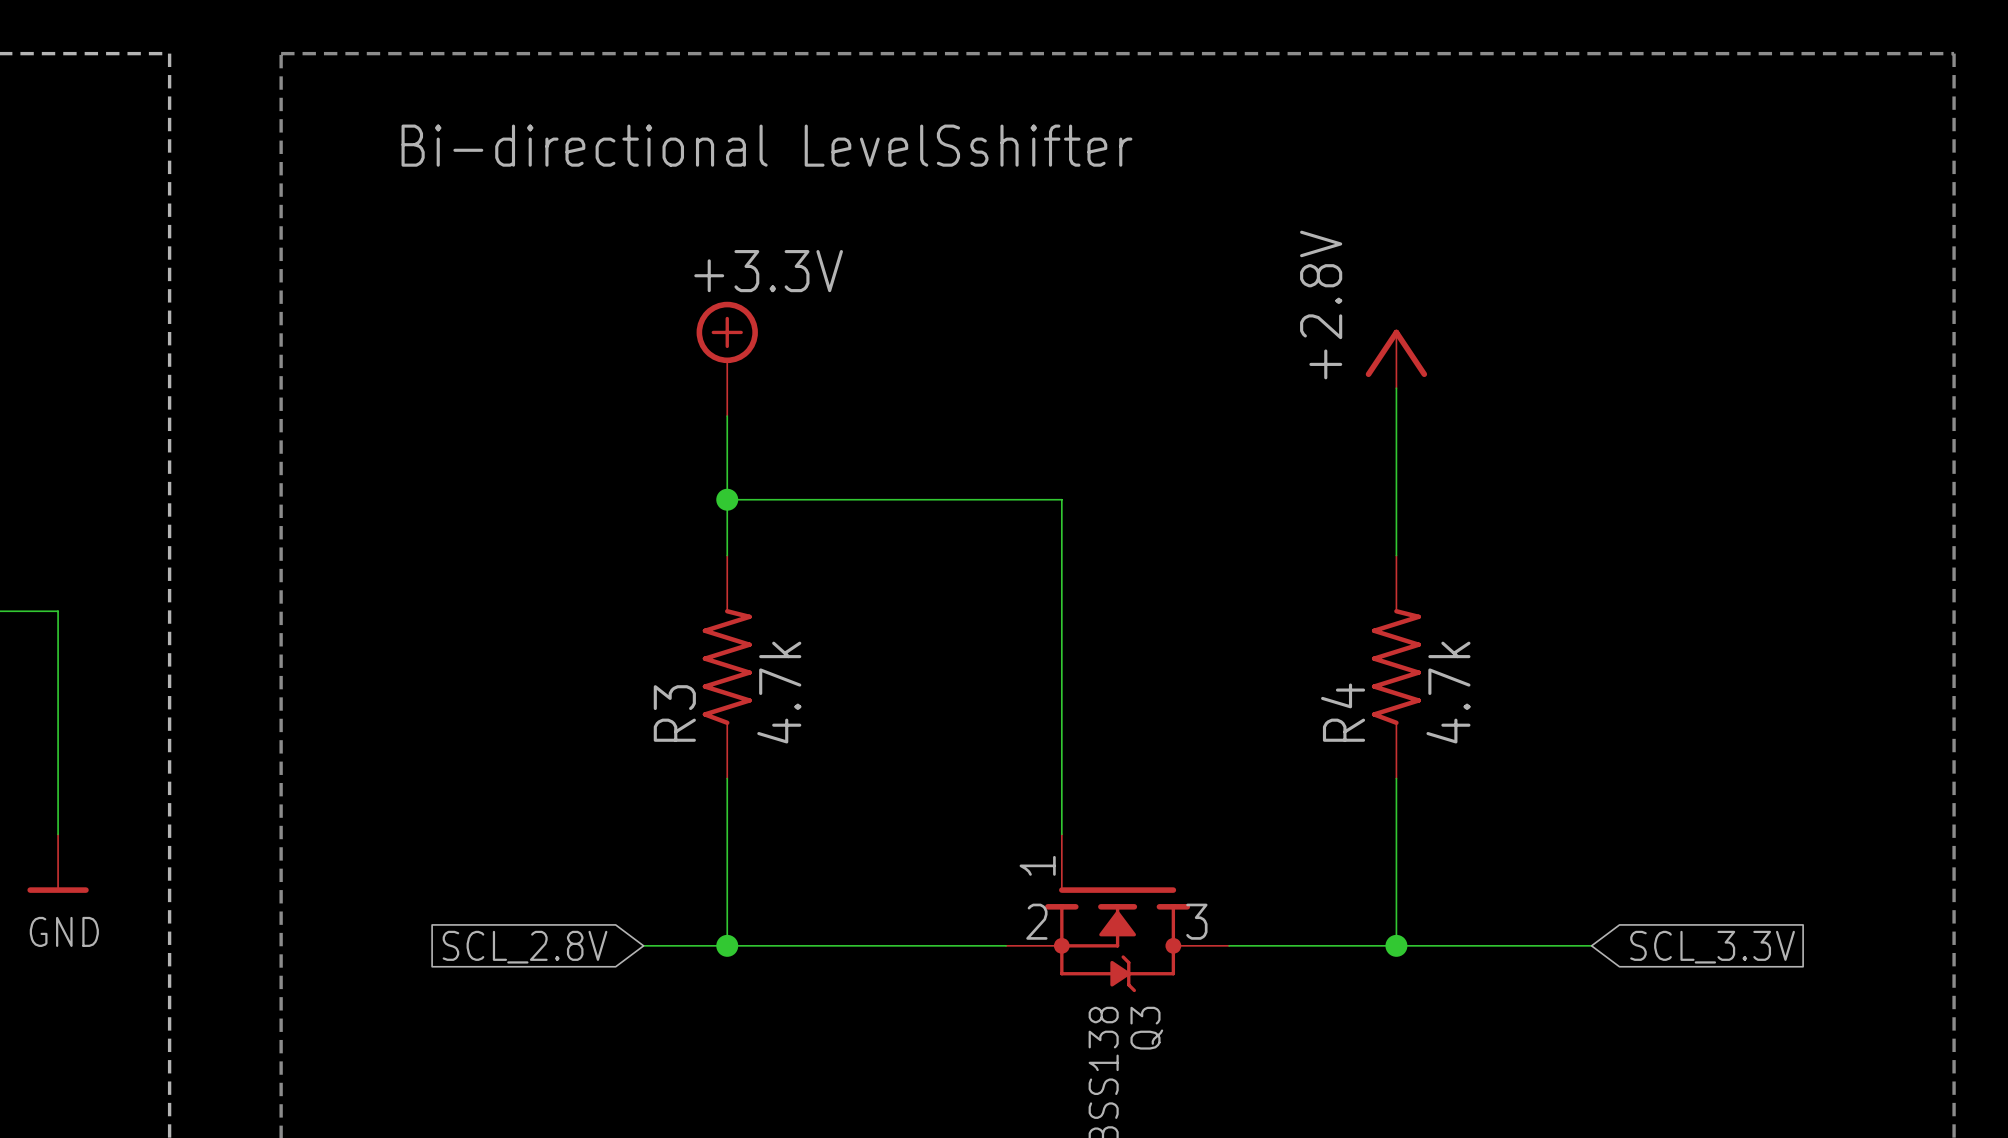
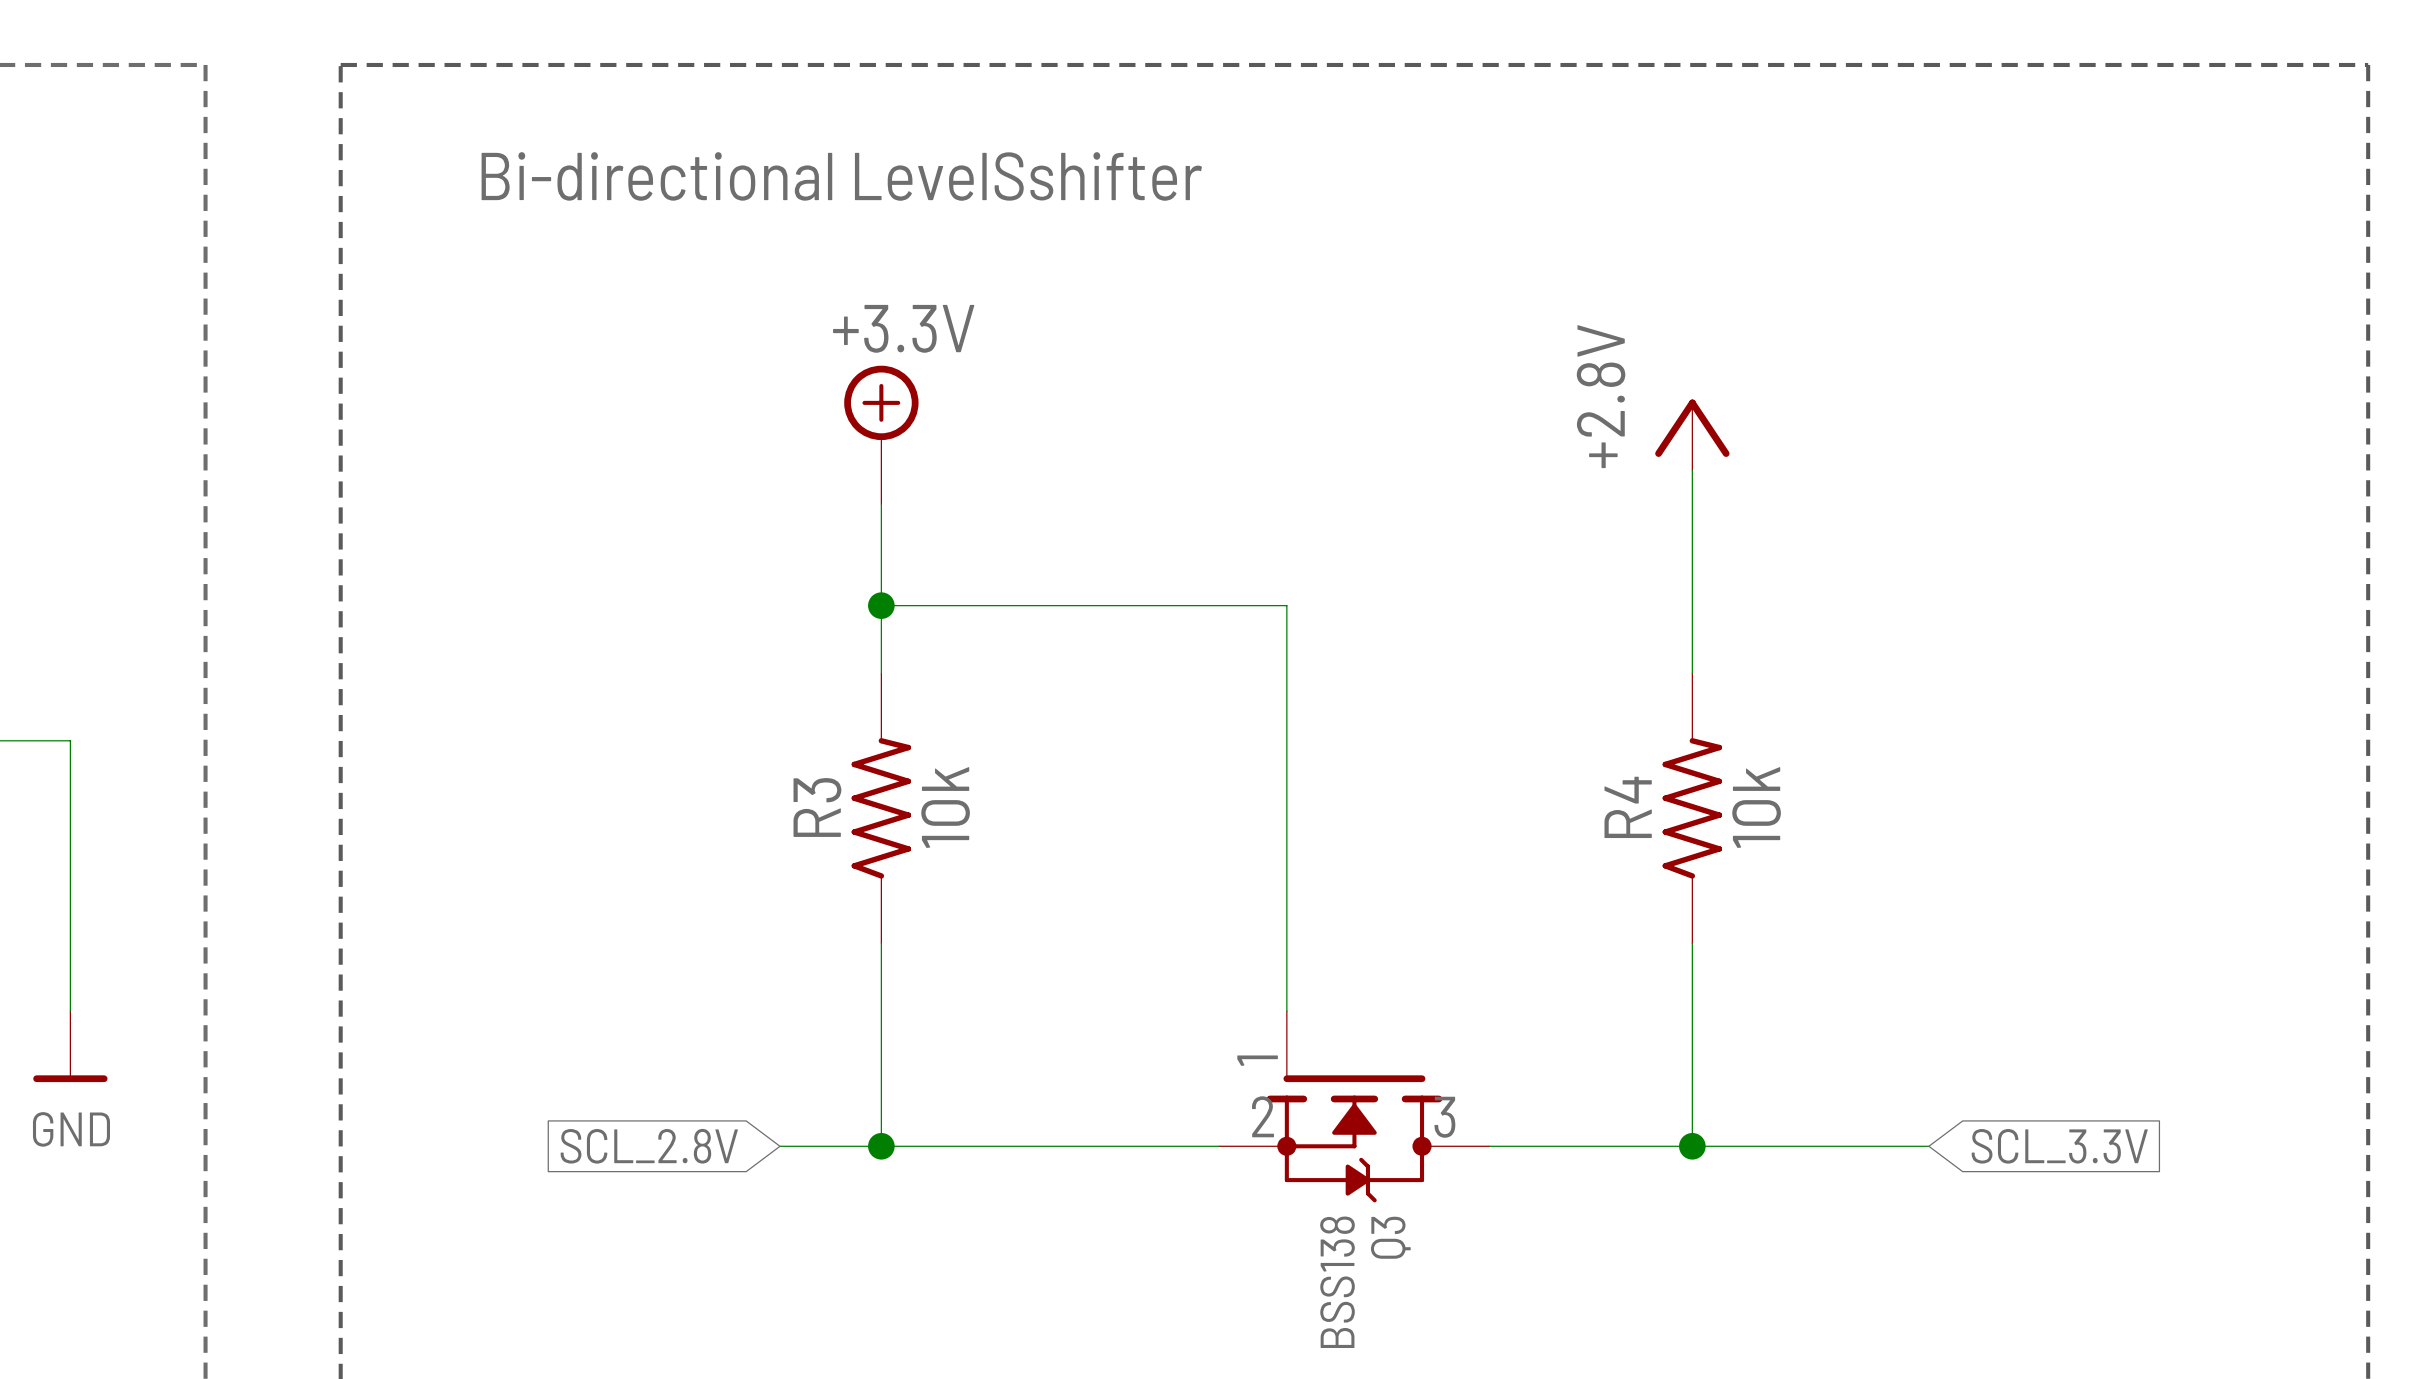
R3 value: 4.7k (779, 692) -> 10k (945, 807)
R4 value: 4.7k (1448, 692) -> 10k (1756, 807)
R4 name position: R4 (1343, 712) -> R4 (1628, 807)
R3 name position: R3 (674, 713) -> R3 (817, 807)

